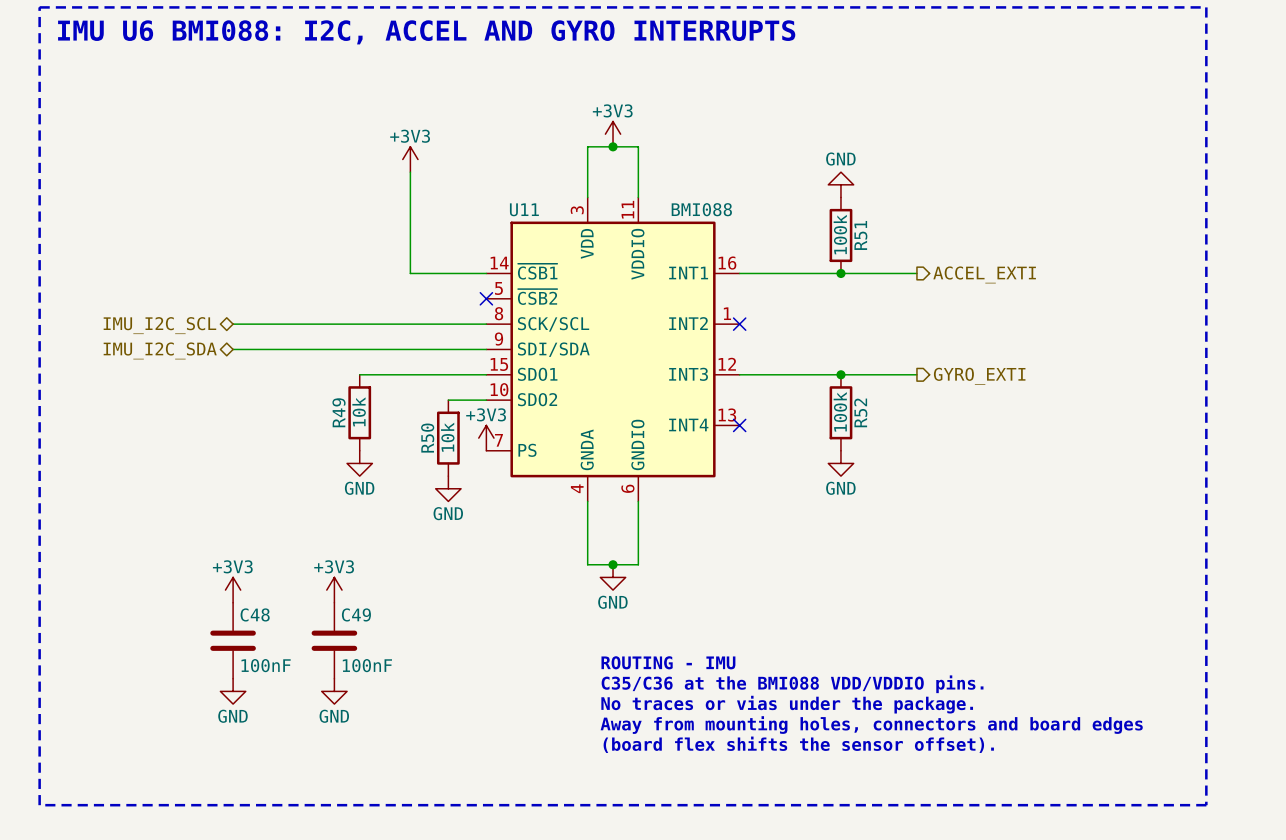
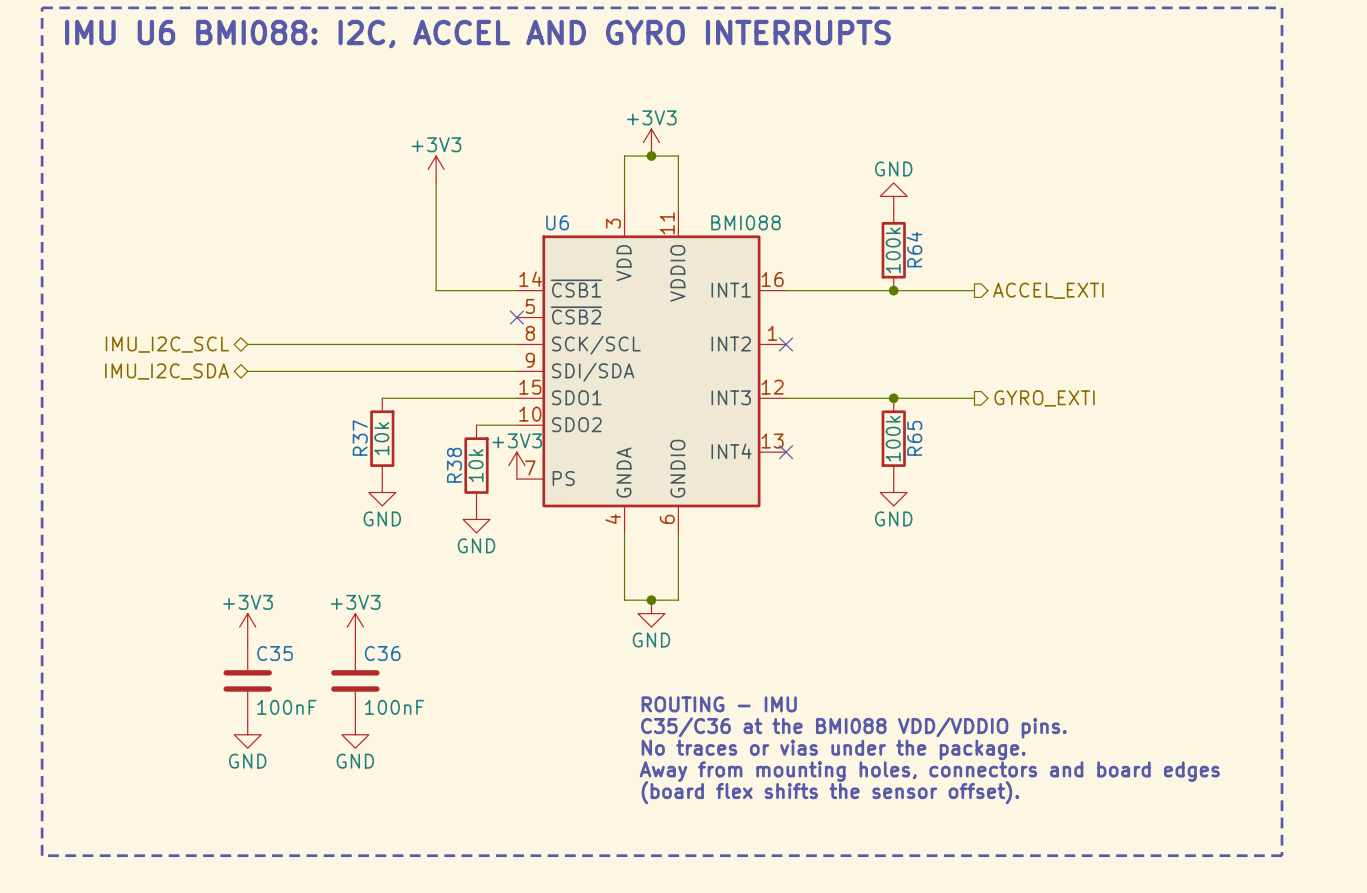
U11 name: U11 (524, 209) -> U6 (557, 222)
R51 name: R51 (860, 235) -> R64 (914, 249)
R49 name: R49 (339, 412) -> R37 (360, 438)
R52 name: R52 (860, 412) -> R65 (914, 438)
R50 name: R50 (427, 438) -> R38 (454, 465)
C48 name: C48 (255, 614) -> C35 (275, 653)
C49 name: C49 (356, 614) -> C36 (382, 653)

